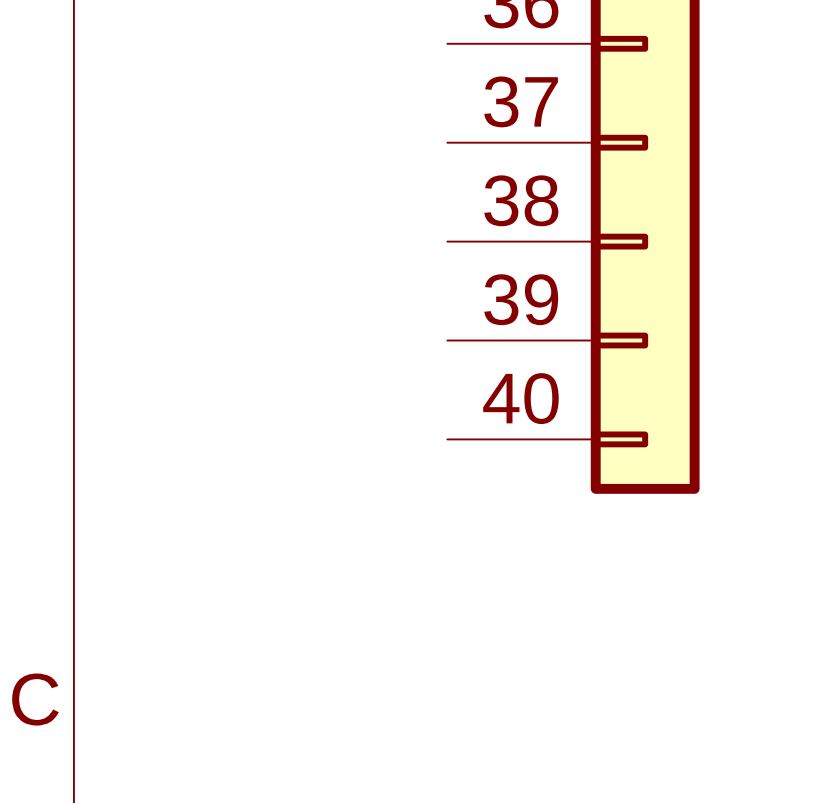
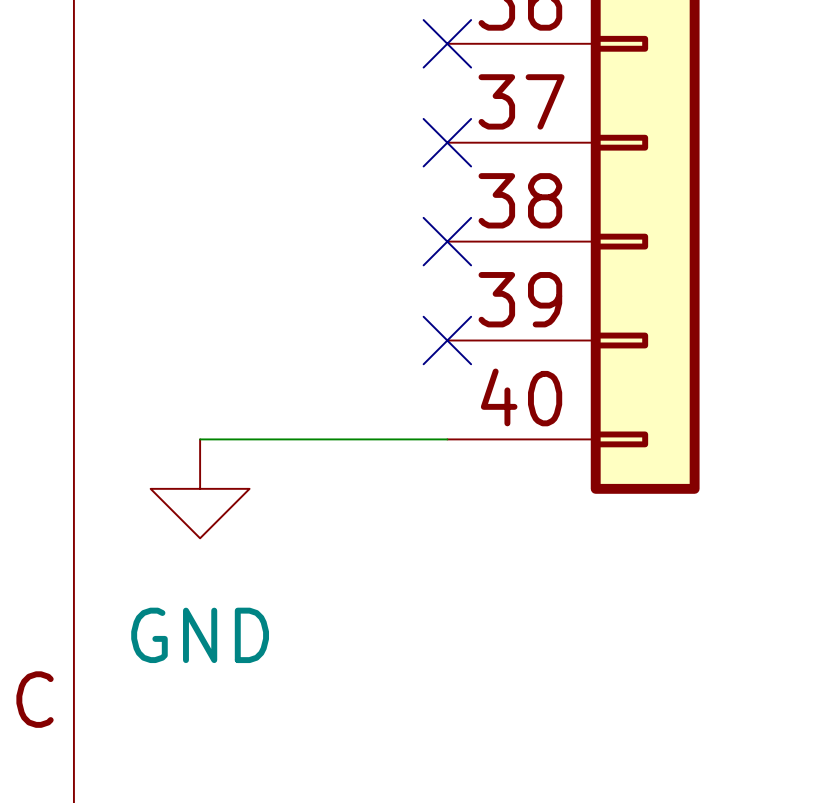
no-connect mark: none -> (447, 43)
no-connect mark: none -> (447, 142)
no-connect mark: none -> (447, 241)
no-connect mark: none -> (447, 340)
wire: none -> (200, 439) (447, 439)
power symbol: none -> GND (200, 488)

